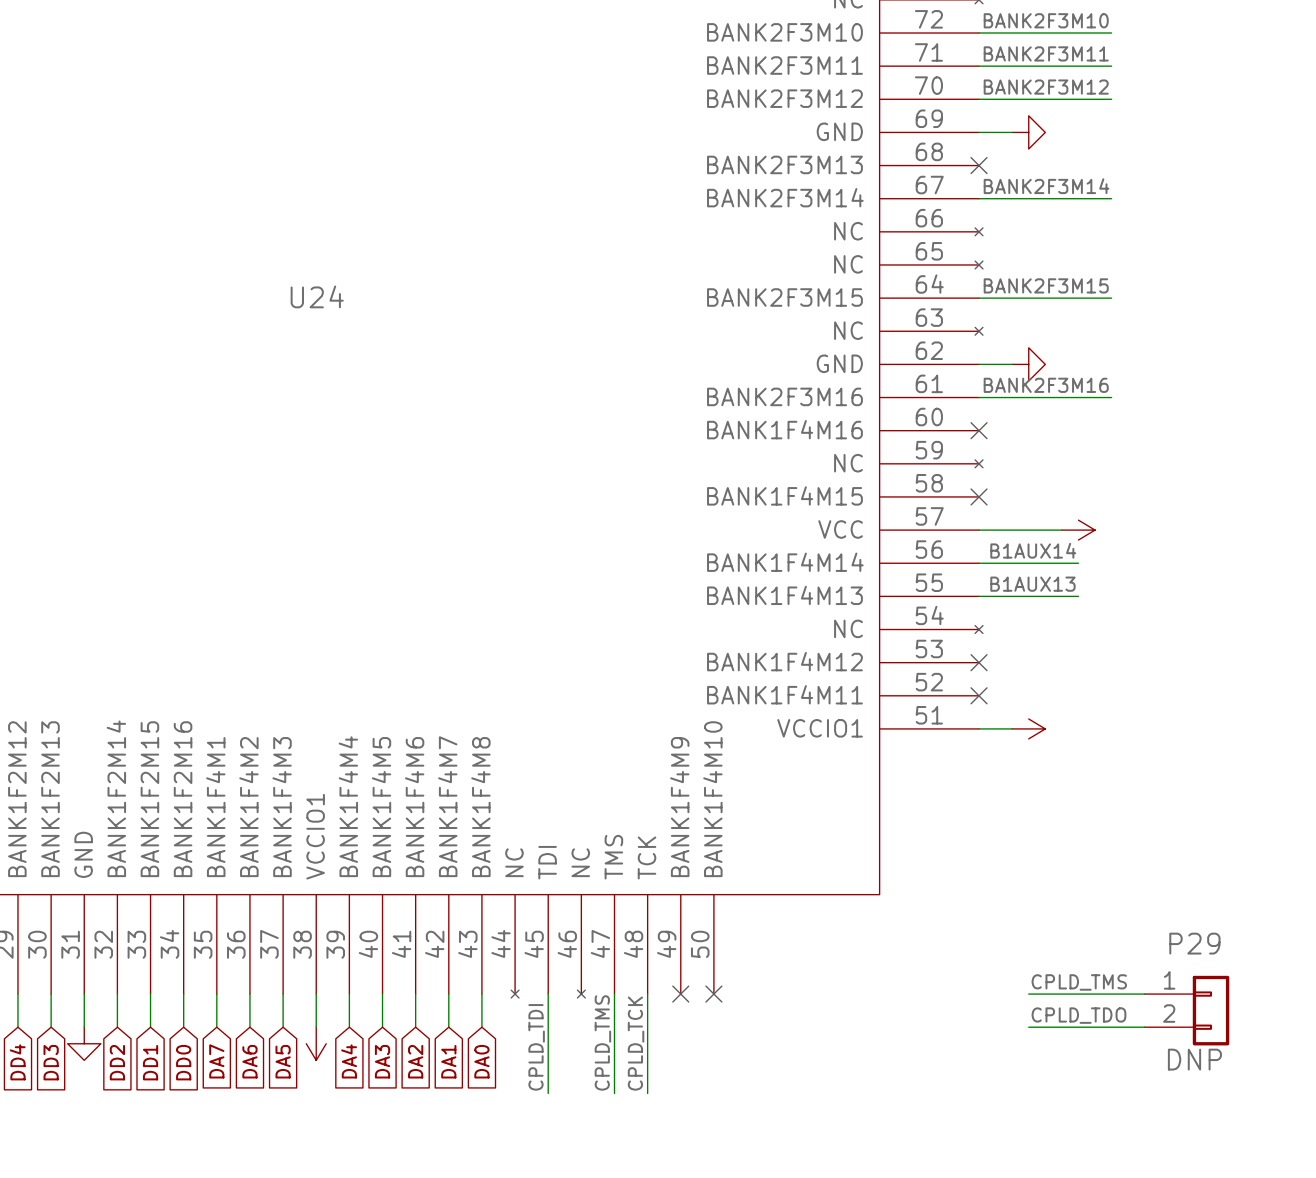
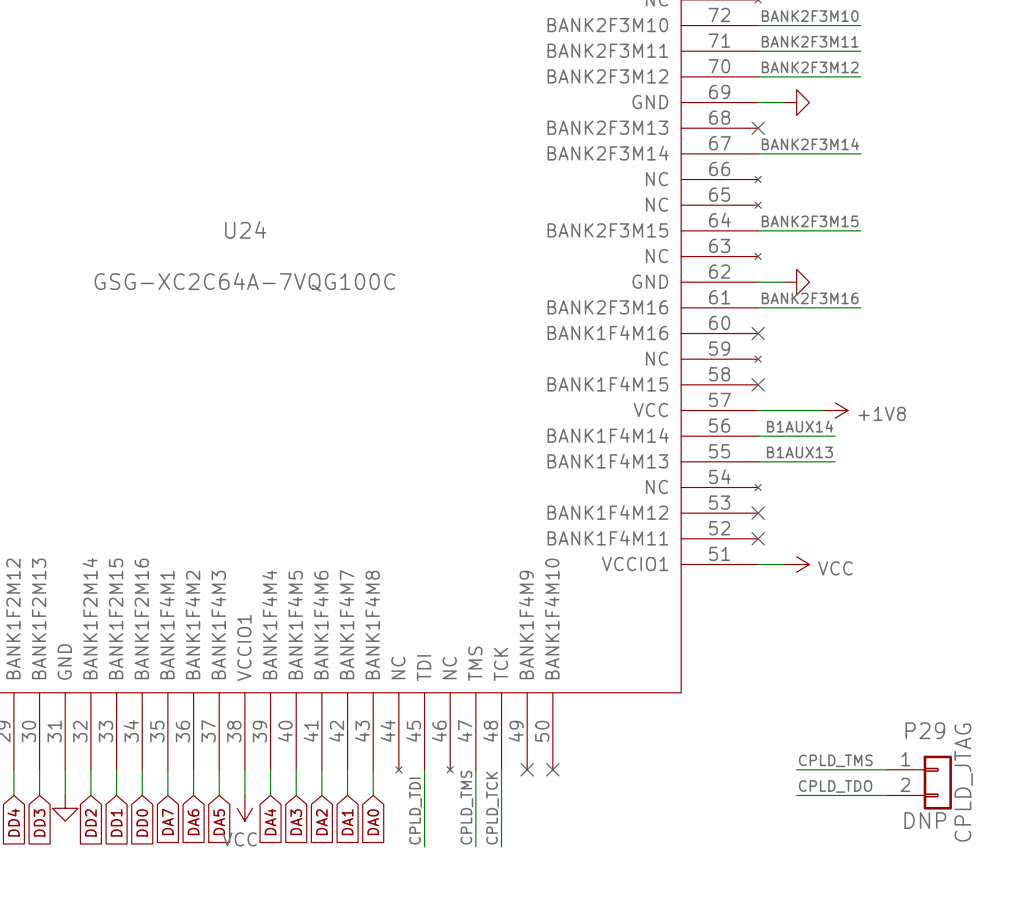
U24 value: none -> GSG-XC2C64A-7VQG100C (244, 281)
power symbol text: none -> +1V8 (882, 413)
power symbol text: none -> VCC (835, 568)
P29 value: none -> CPLD_JTAG (963, 782)
power symbol text: none -> VCC (239, 839)

